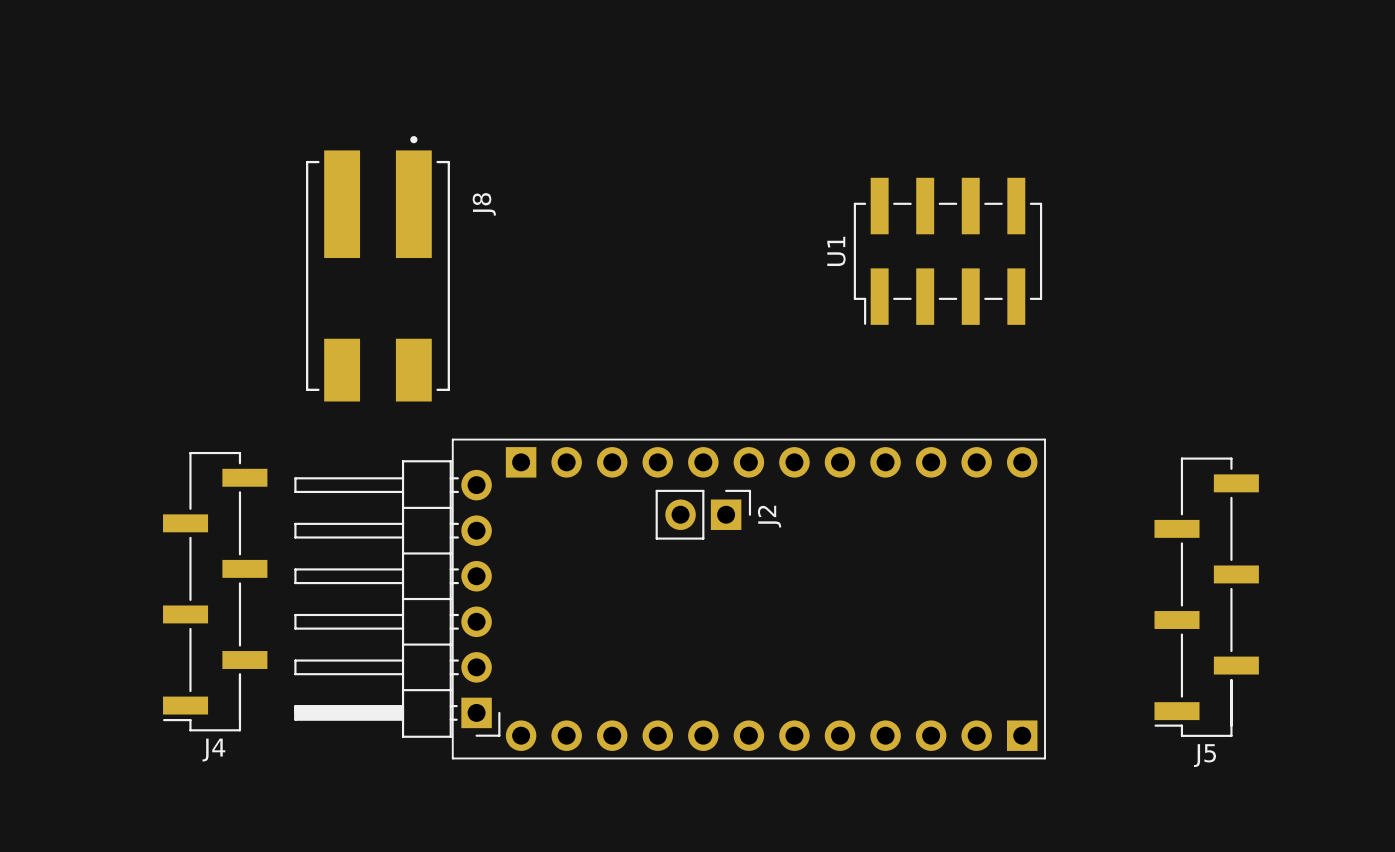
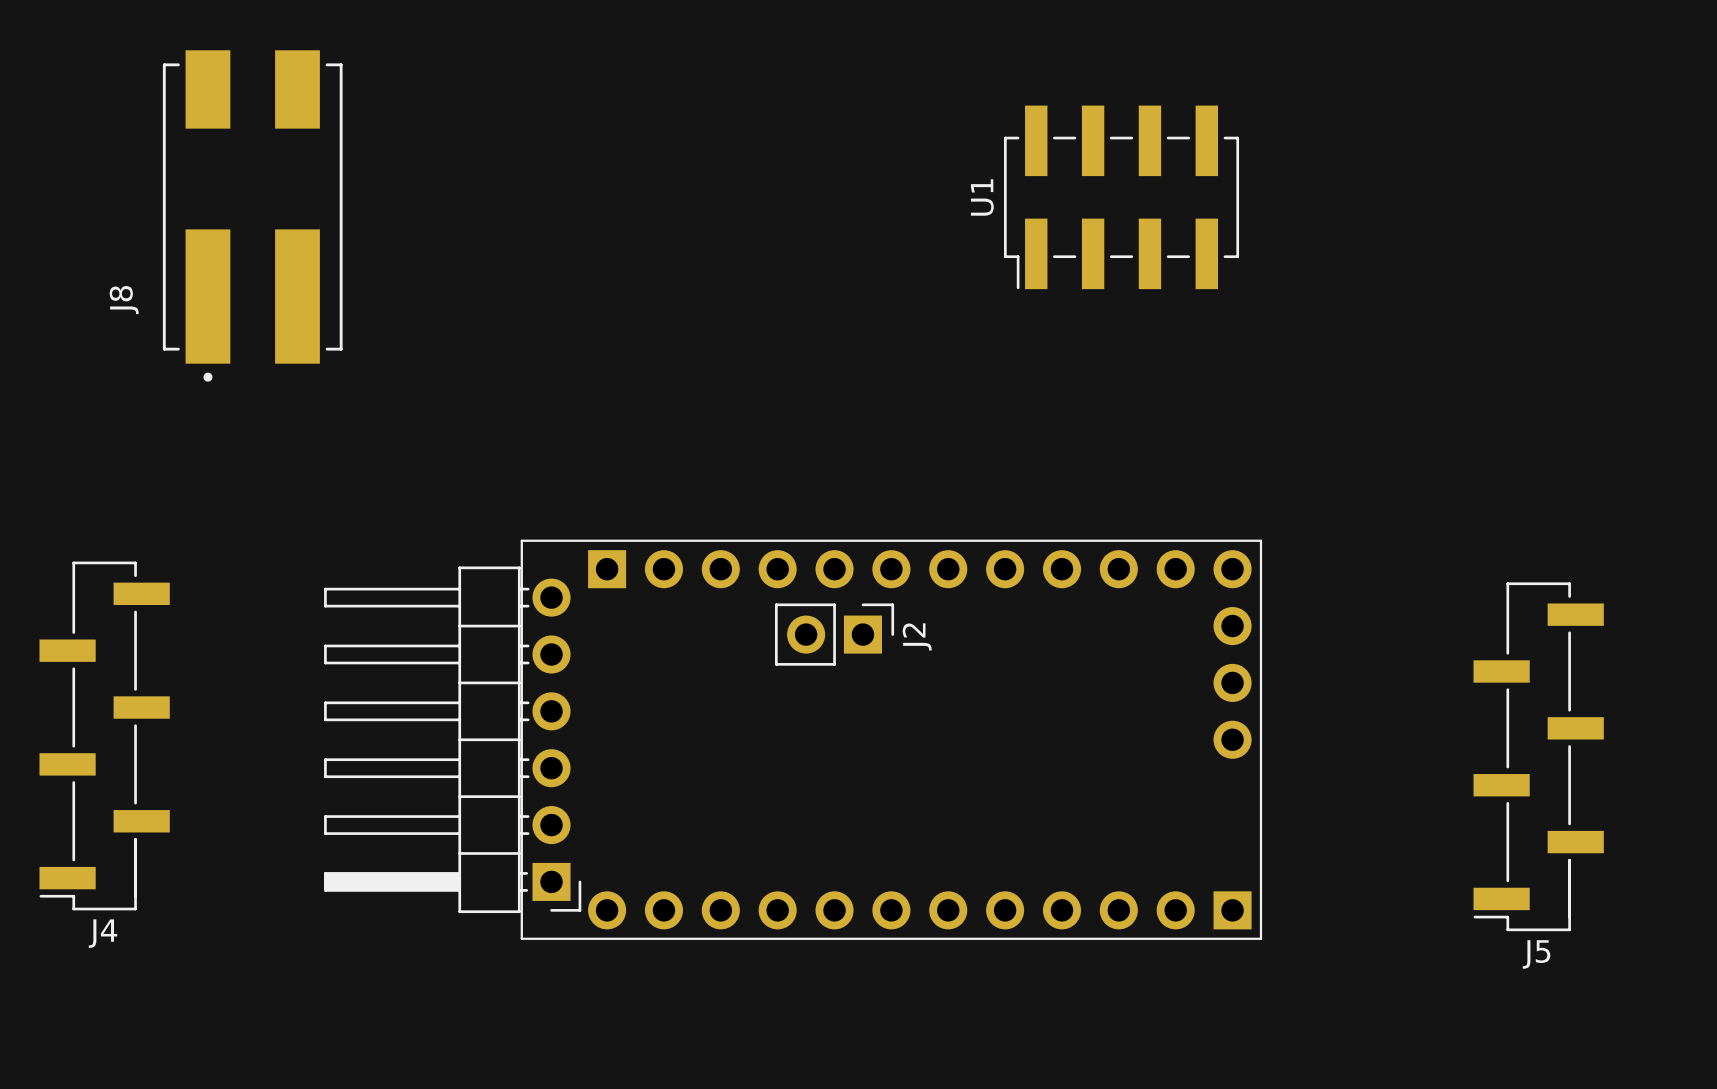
U1 position: (947, 251) -> (1121, 197)
J8 rotation: 0° (377, 268) -> 180° (252, 215)
J8 position: (377, 268) -> (252, 215)
part: none -> (1232, 626)
part: none -> (1232, 682)
J4 position: (215, 591) -> (104, 735)
J5 position: (1206, 597) -> (1538, 756)
part: none -> (1232, 739)

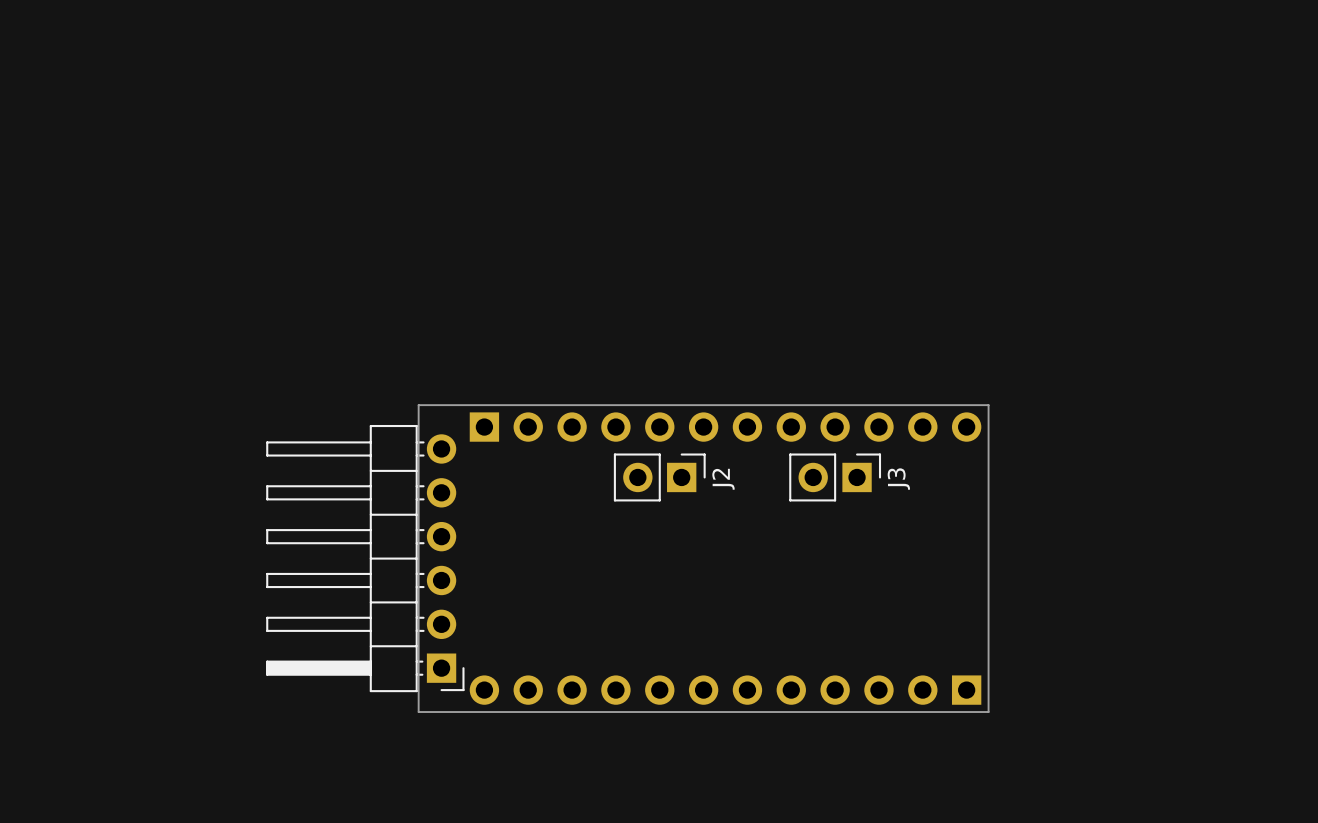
U1: (1121, 197) -> none
J8: (252, 215) -> none
line: (521, 540) (1260, 540) (1260, 938) (521, 938) (521, 540) -> none
board edge: none -> (418, 405) (988, 405) (988, 712) (418, 712) (418, 405)
part: (1232, 626) -> none
J3: none -> (835, 477)
part: (1232, 682) -> none
J4: (104, 735) -> none
part: (1232, 739) -> none
J5: (1538, 756) -> none

